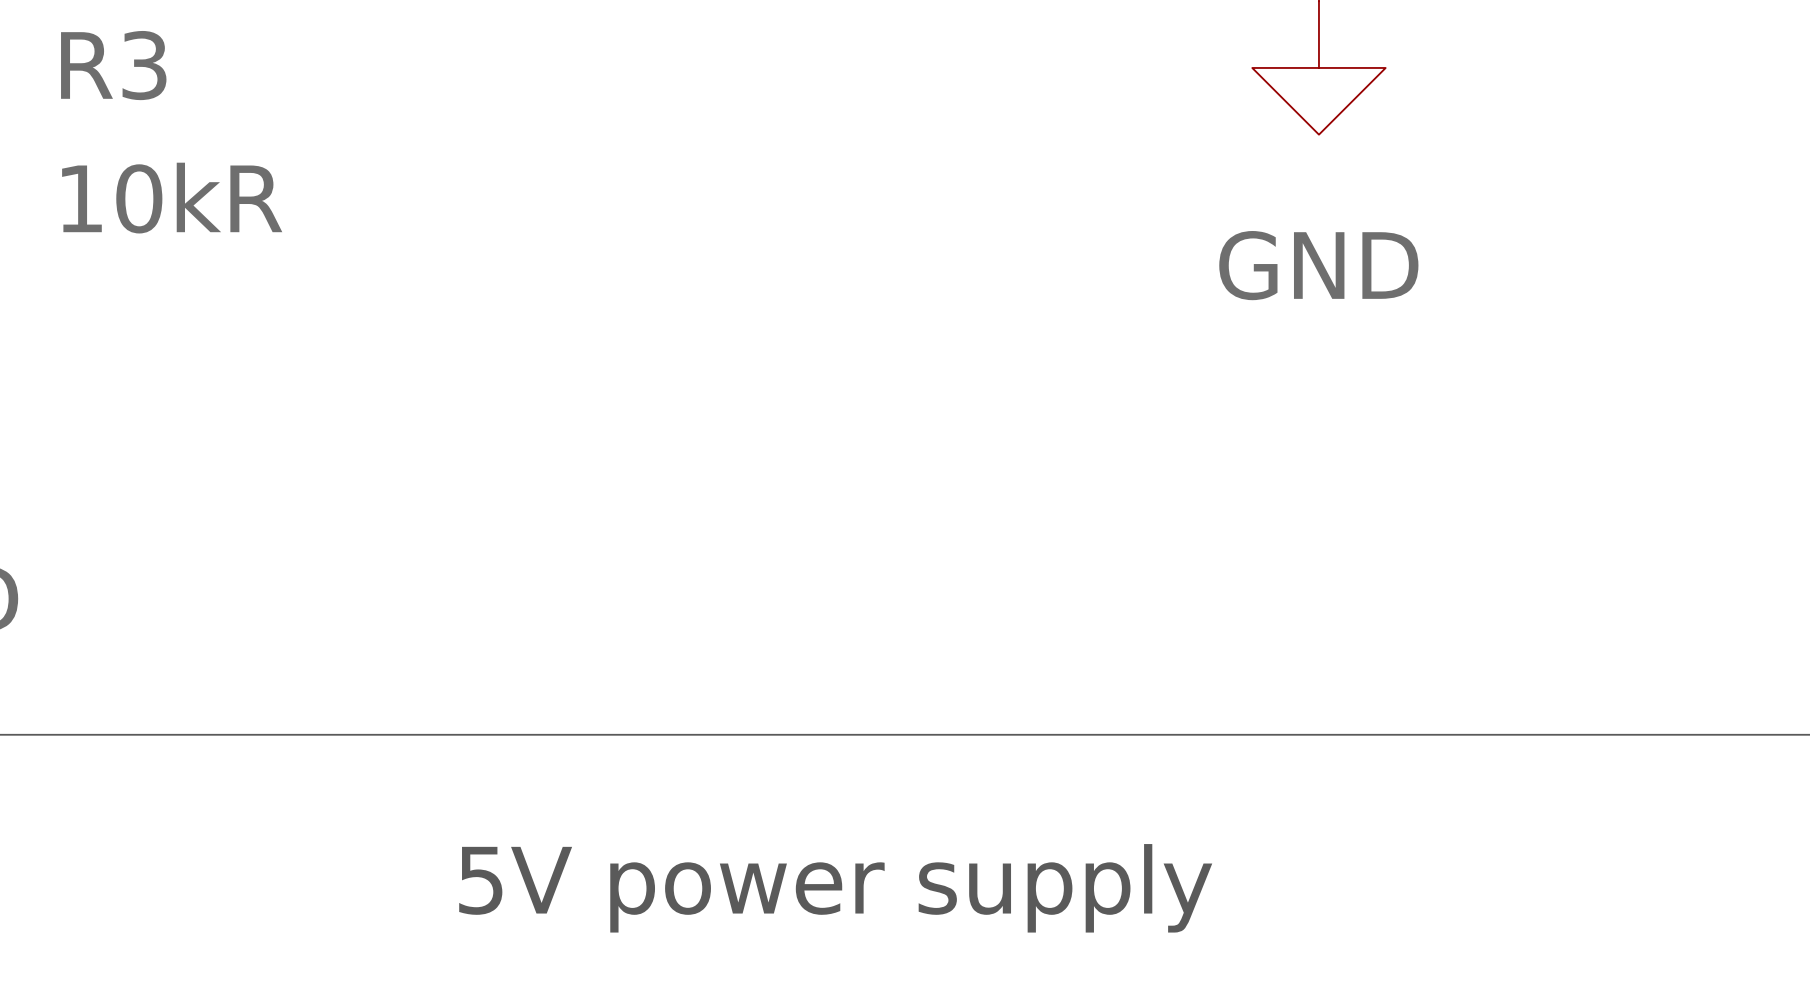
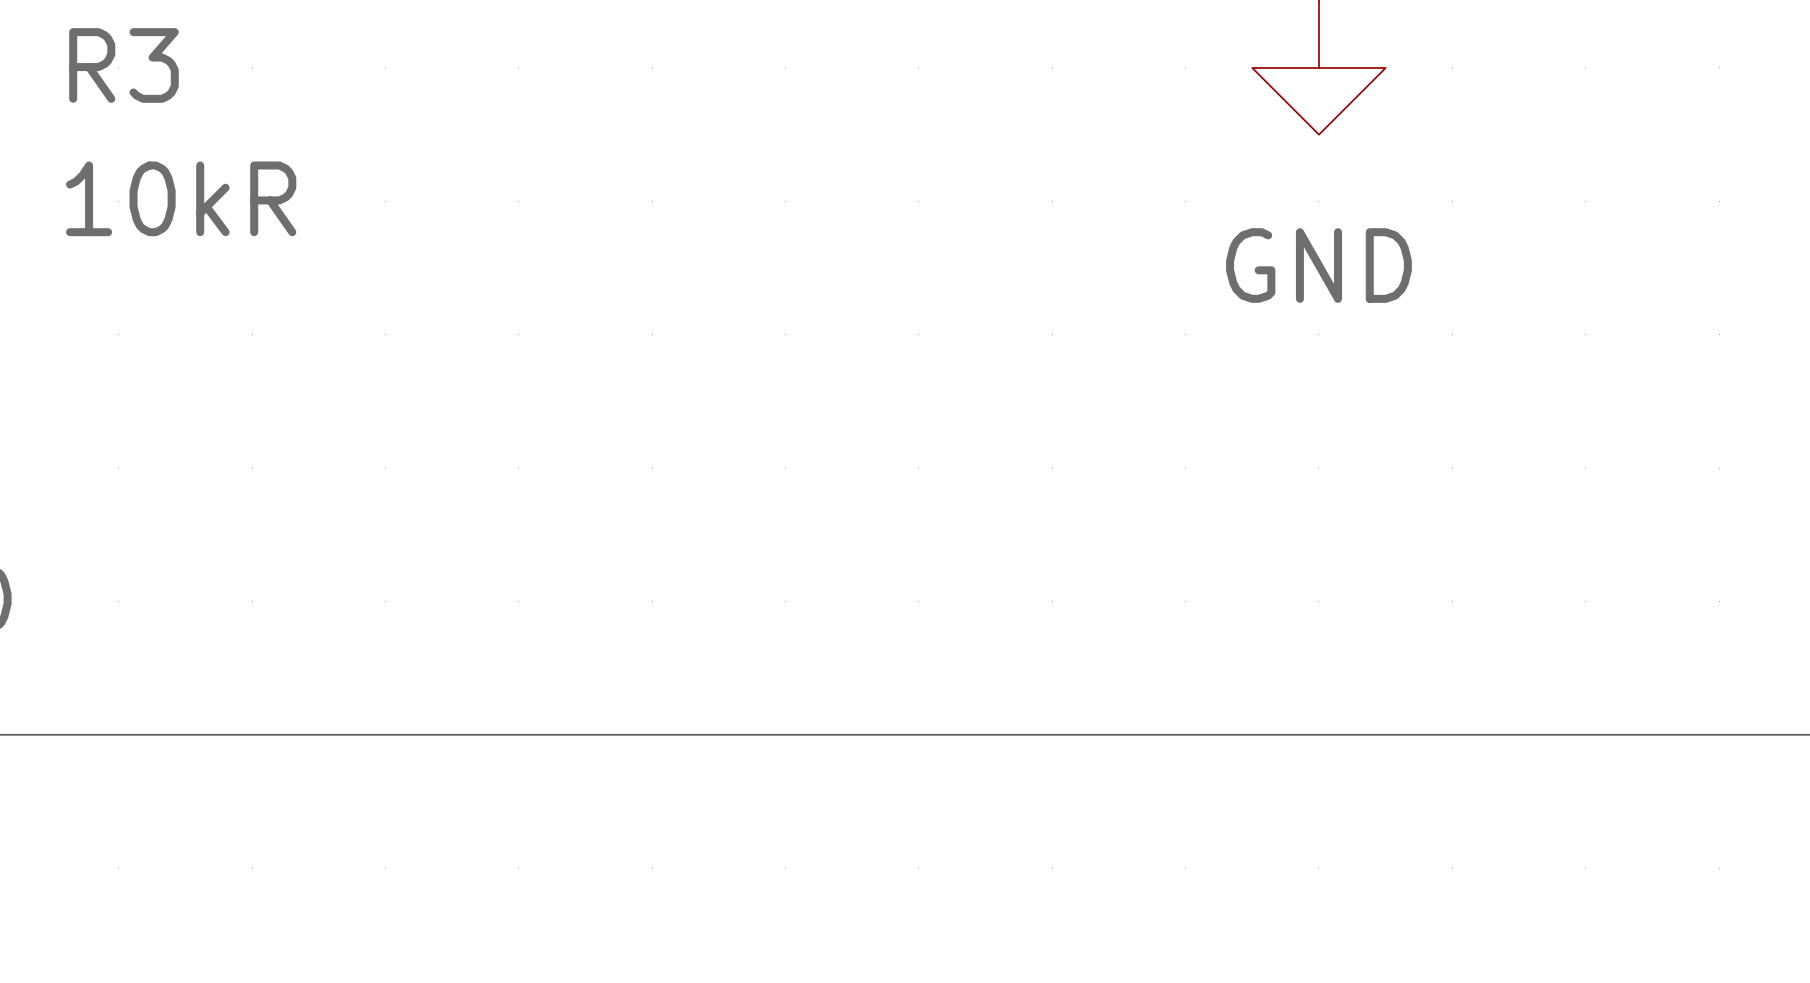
text: 5V power supply (835, 888) -> none

